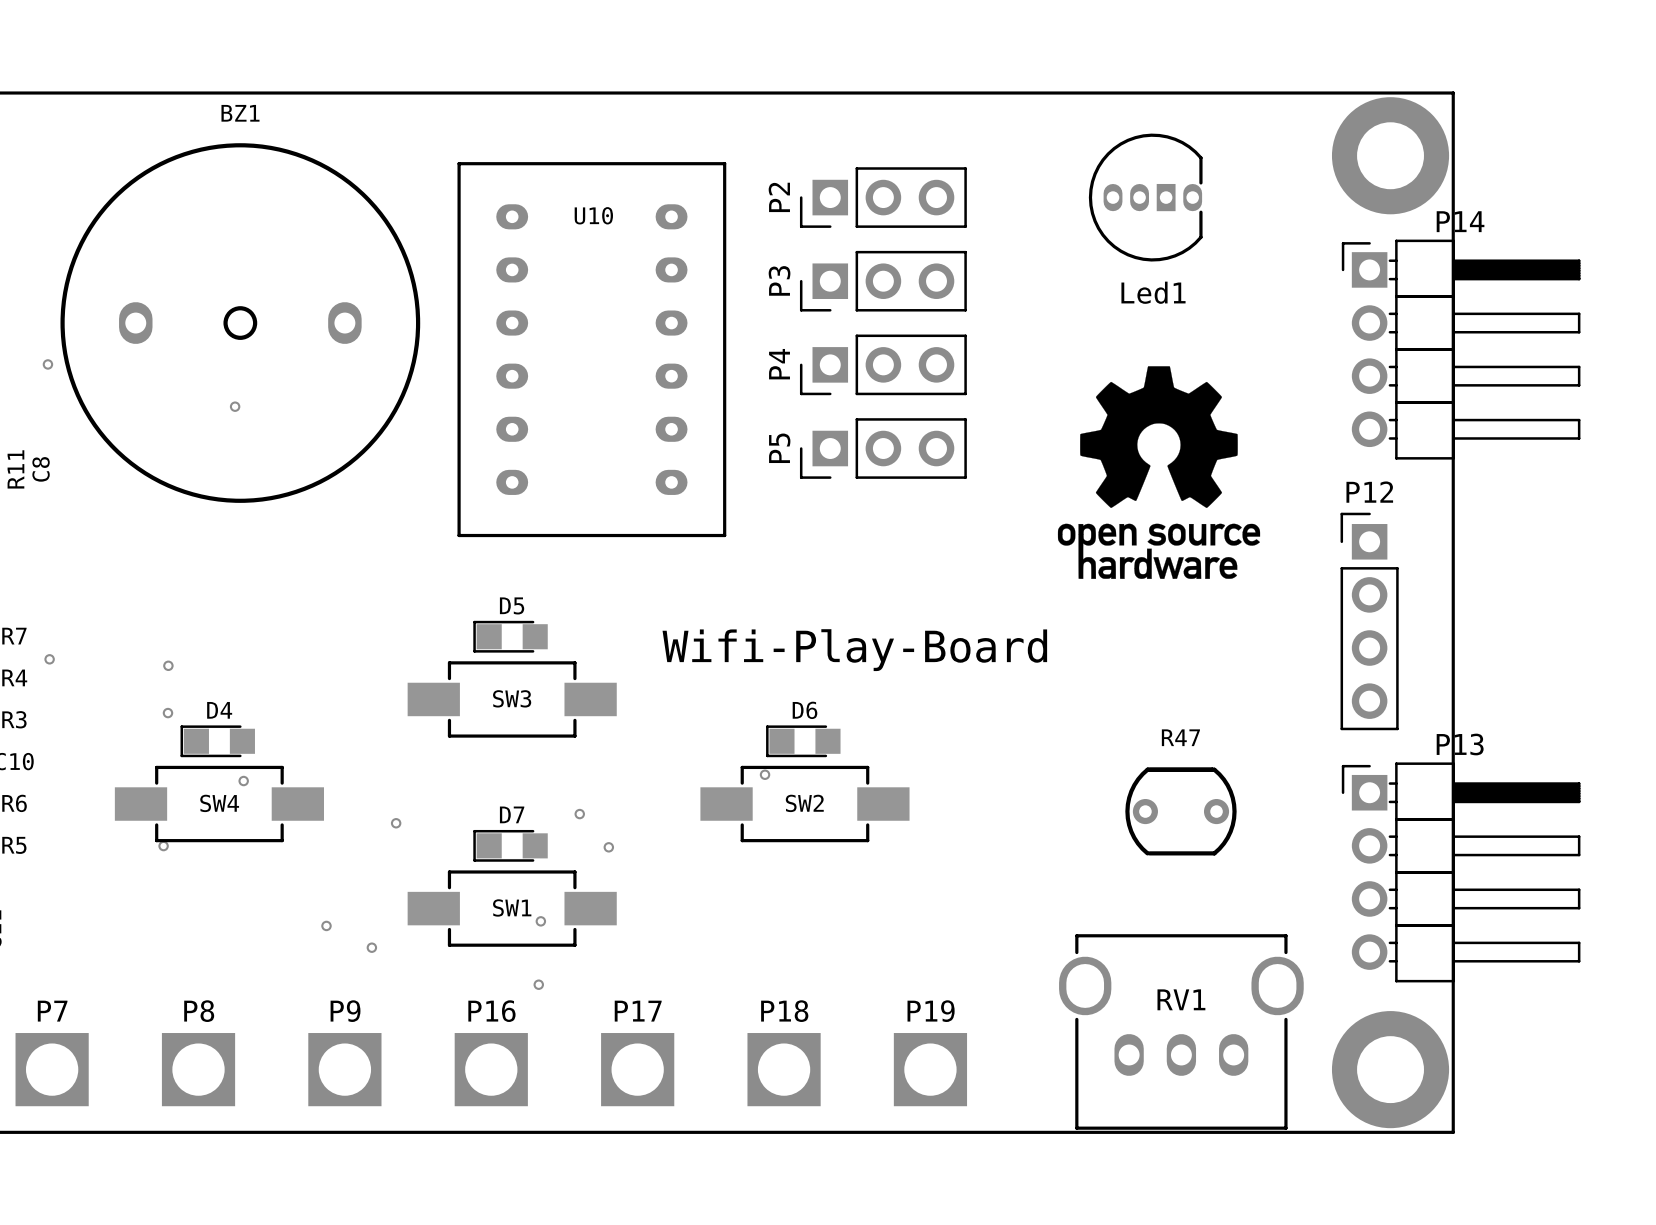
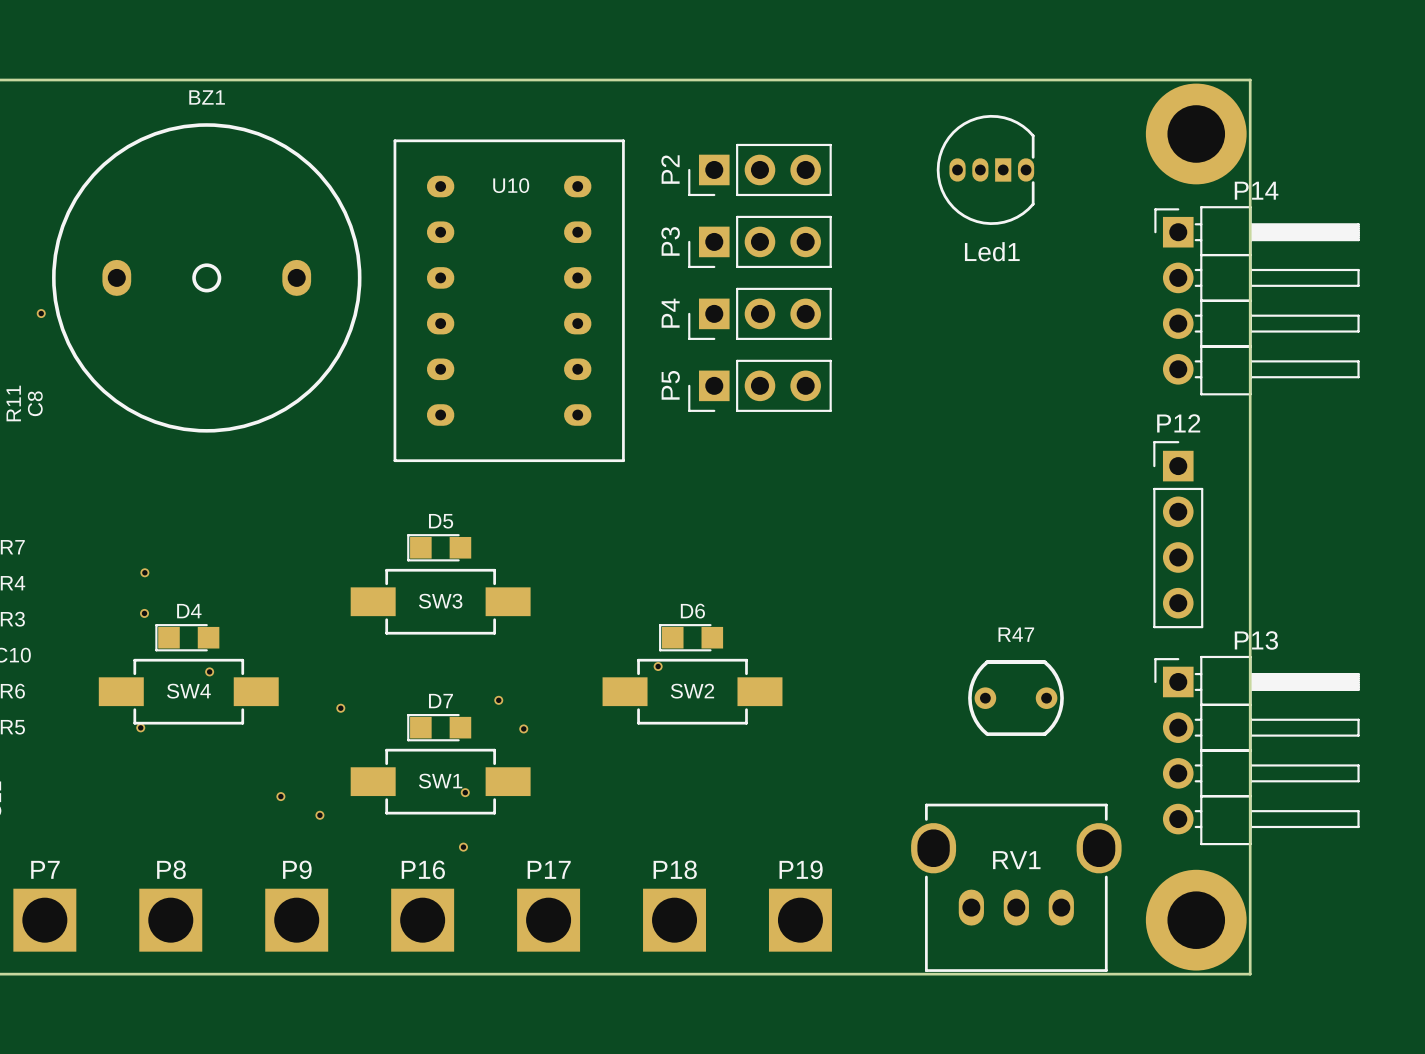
drawing: [1057, 366, 1261, 579] -> none
part: (235, 406) -> none
text: Wifi-Play-Board (854, 650) -> none
part: (49, 659) -> none

